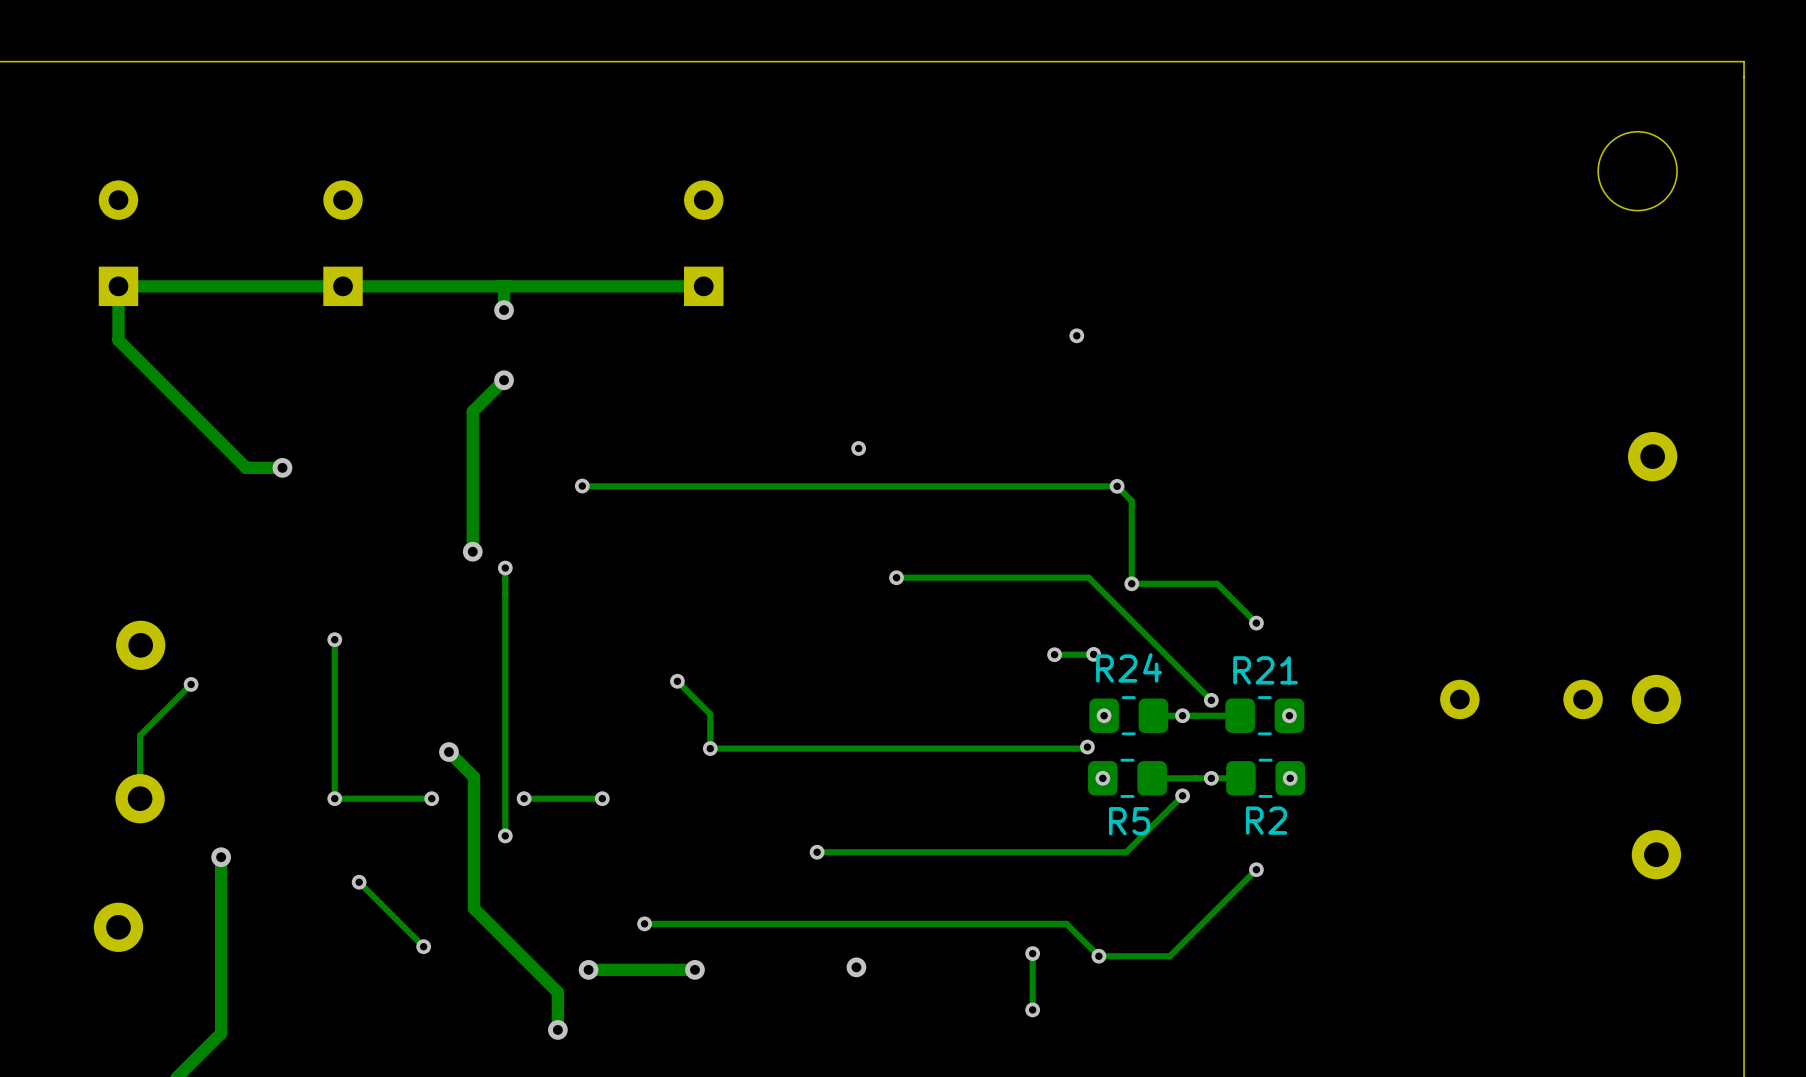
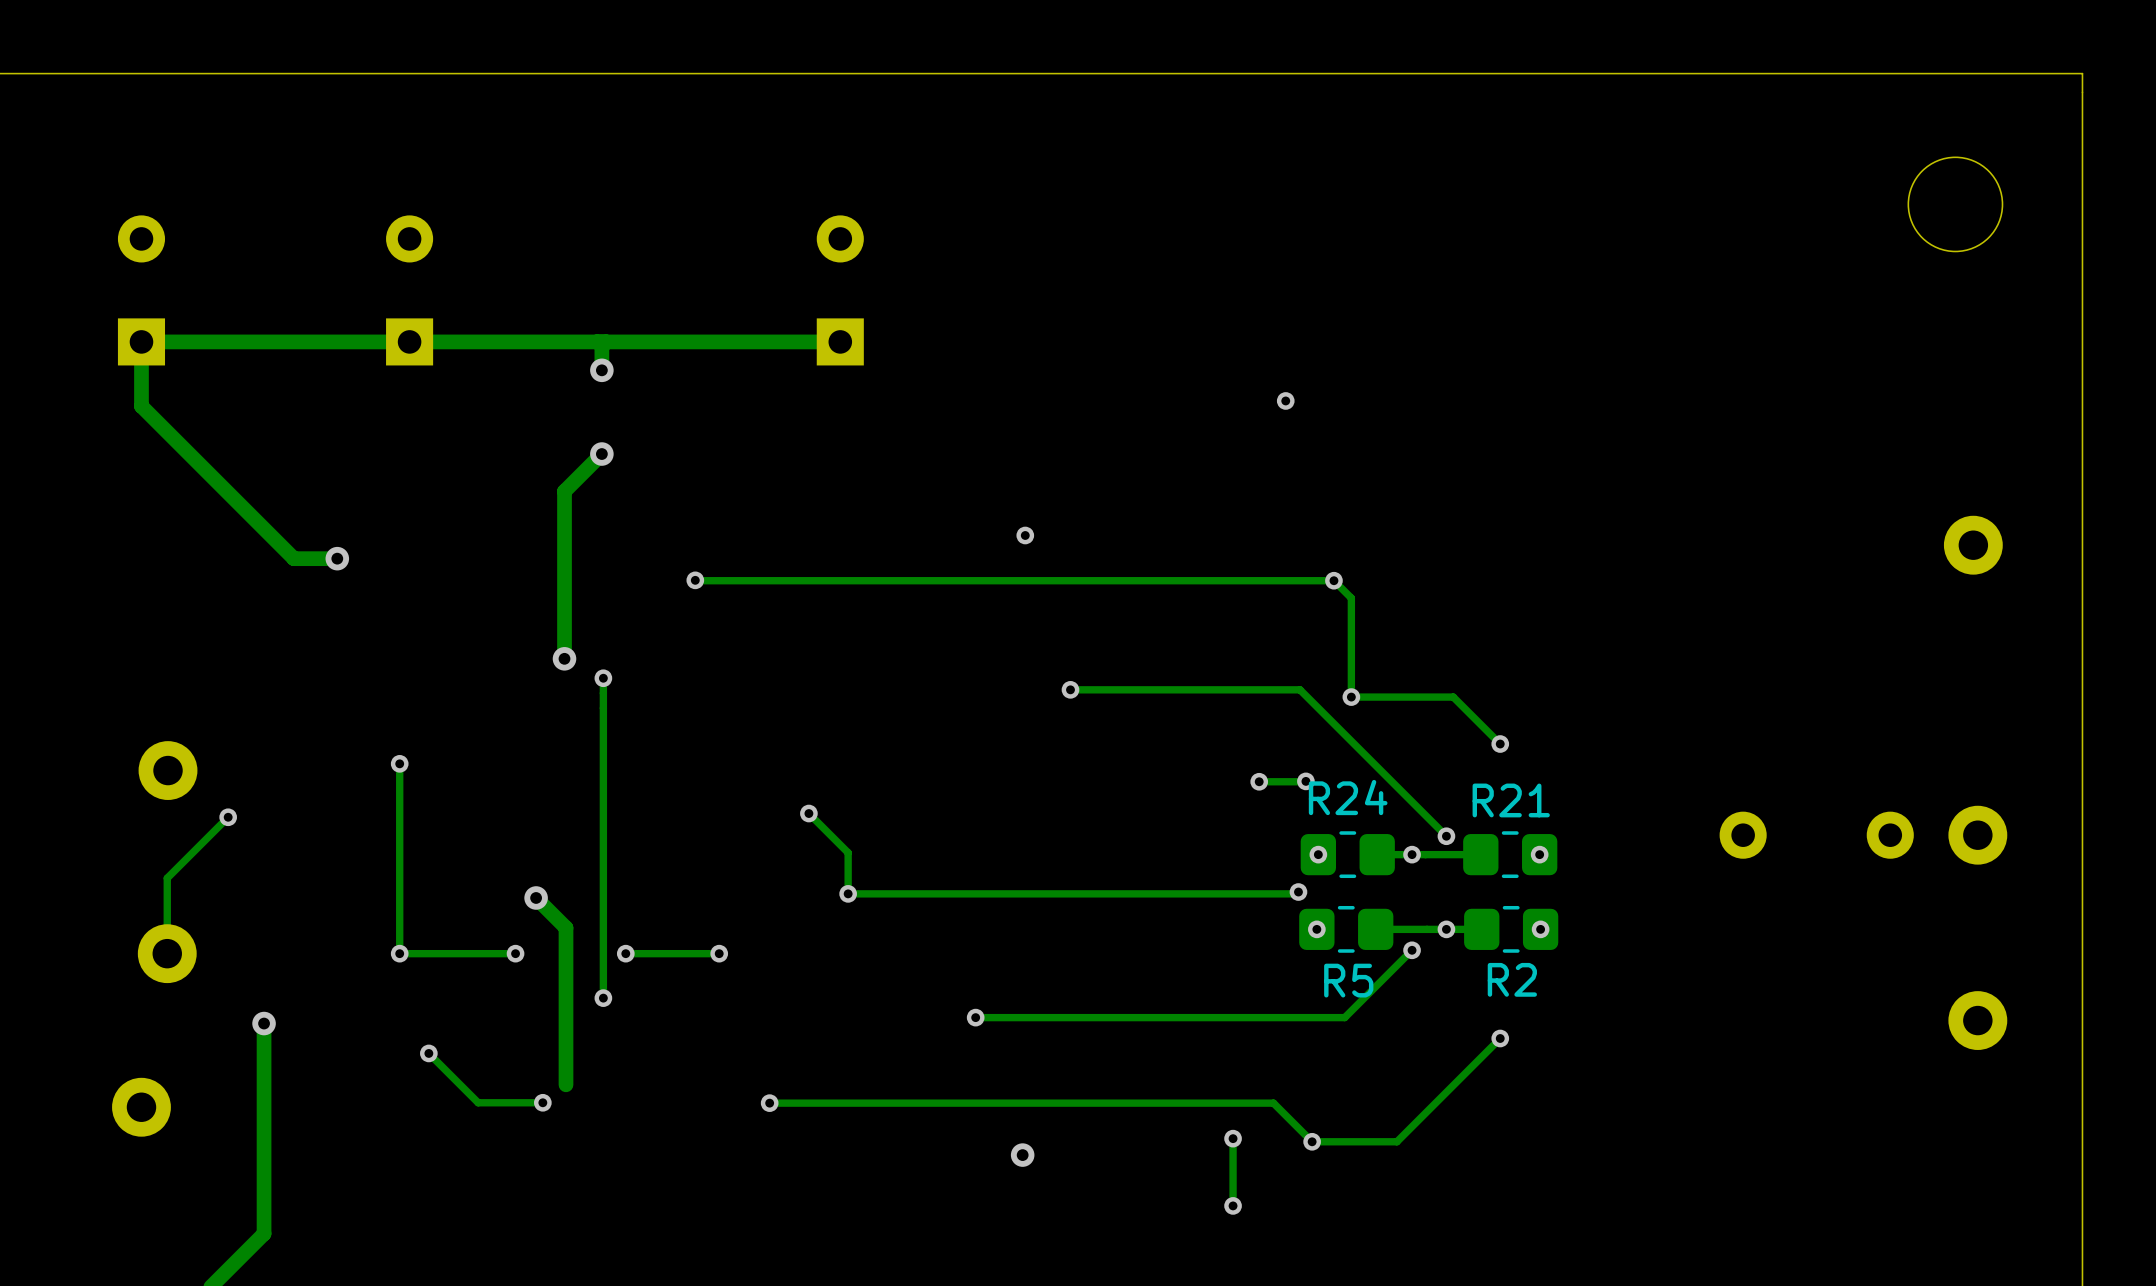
track: (474, 908) (557, 992) (557, 1029) -> none
track: (400, 923) (423, 946) -> (478, 1102) (542, 1102)
via position: (423, 946) -> (542, 1102)
via: (588, 969) -> none
track: (694, 969) (588, 969) -> none
via: (694, 969) -> none
via: (557, 1029) -> none

